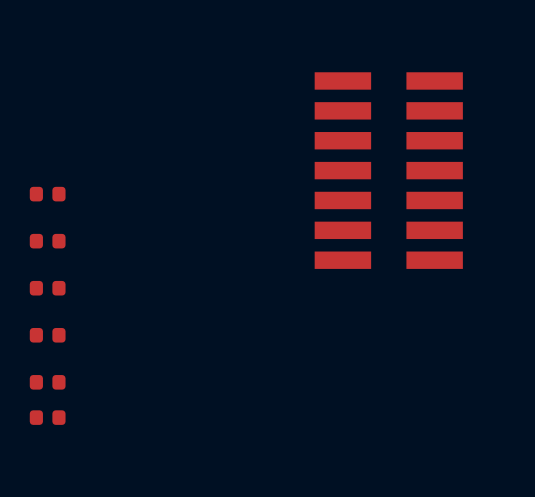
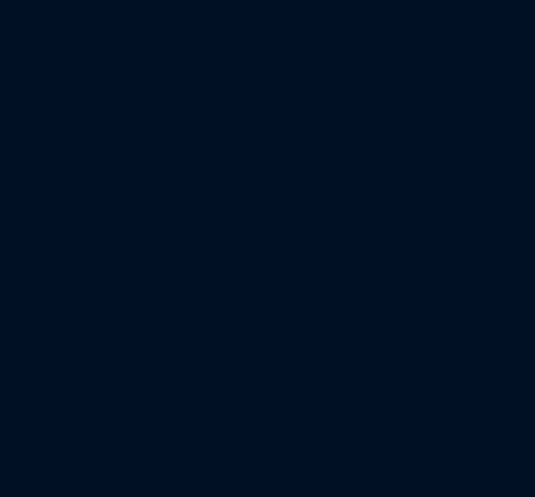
part: (388, 170) -> none
part: (47, 194) -> none
part: (47, 241) -> none
part: (47, 288) -> none
part: (47, 335) -> none
part: (47, 382) -> none
part: (47, 417) -> none

